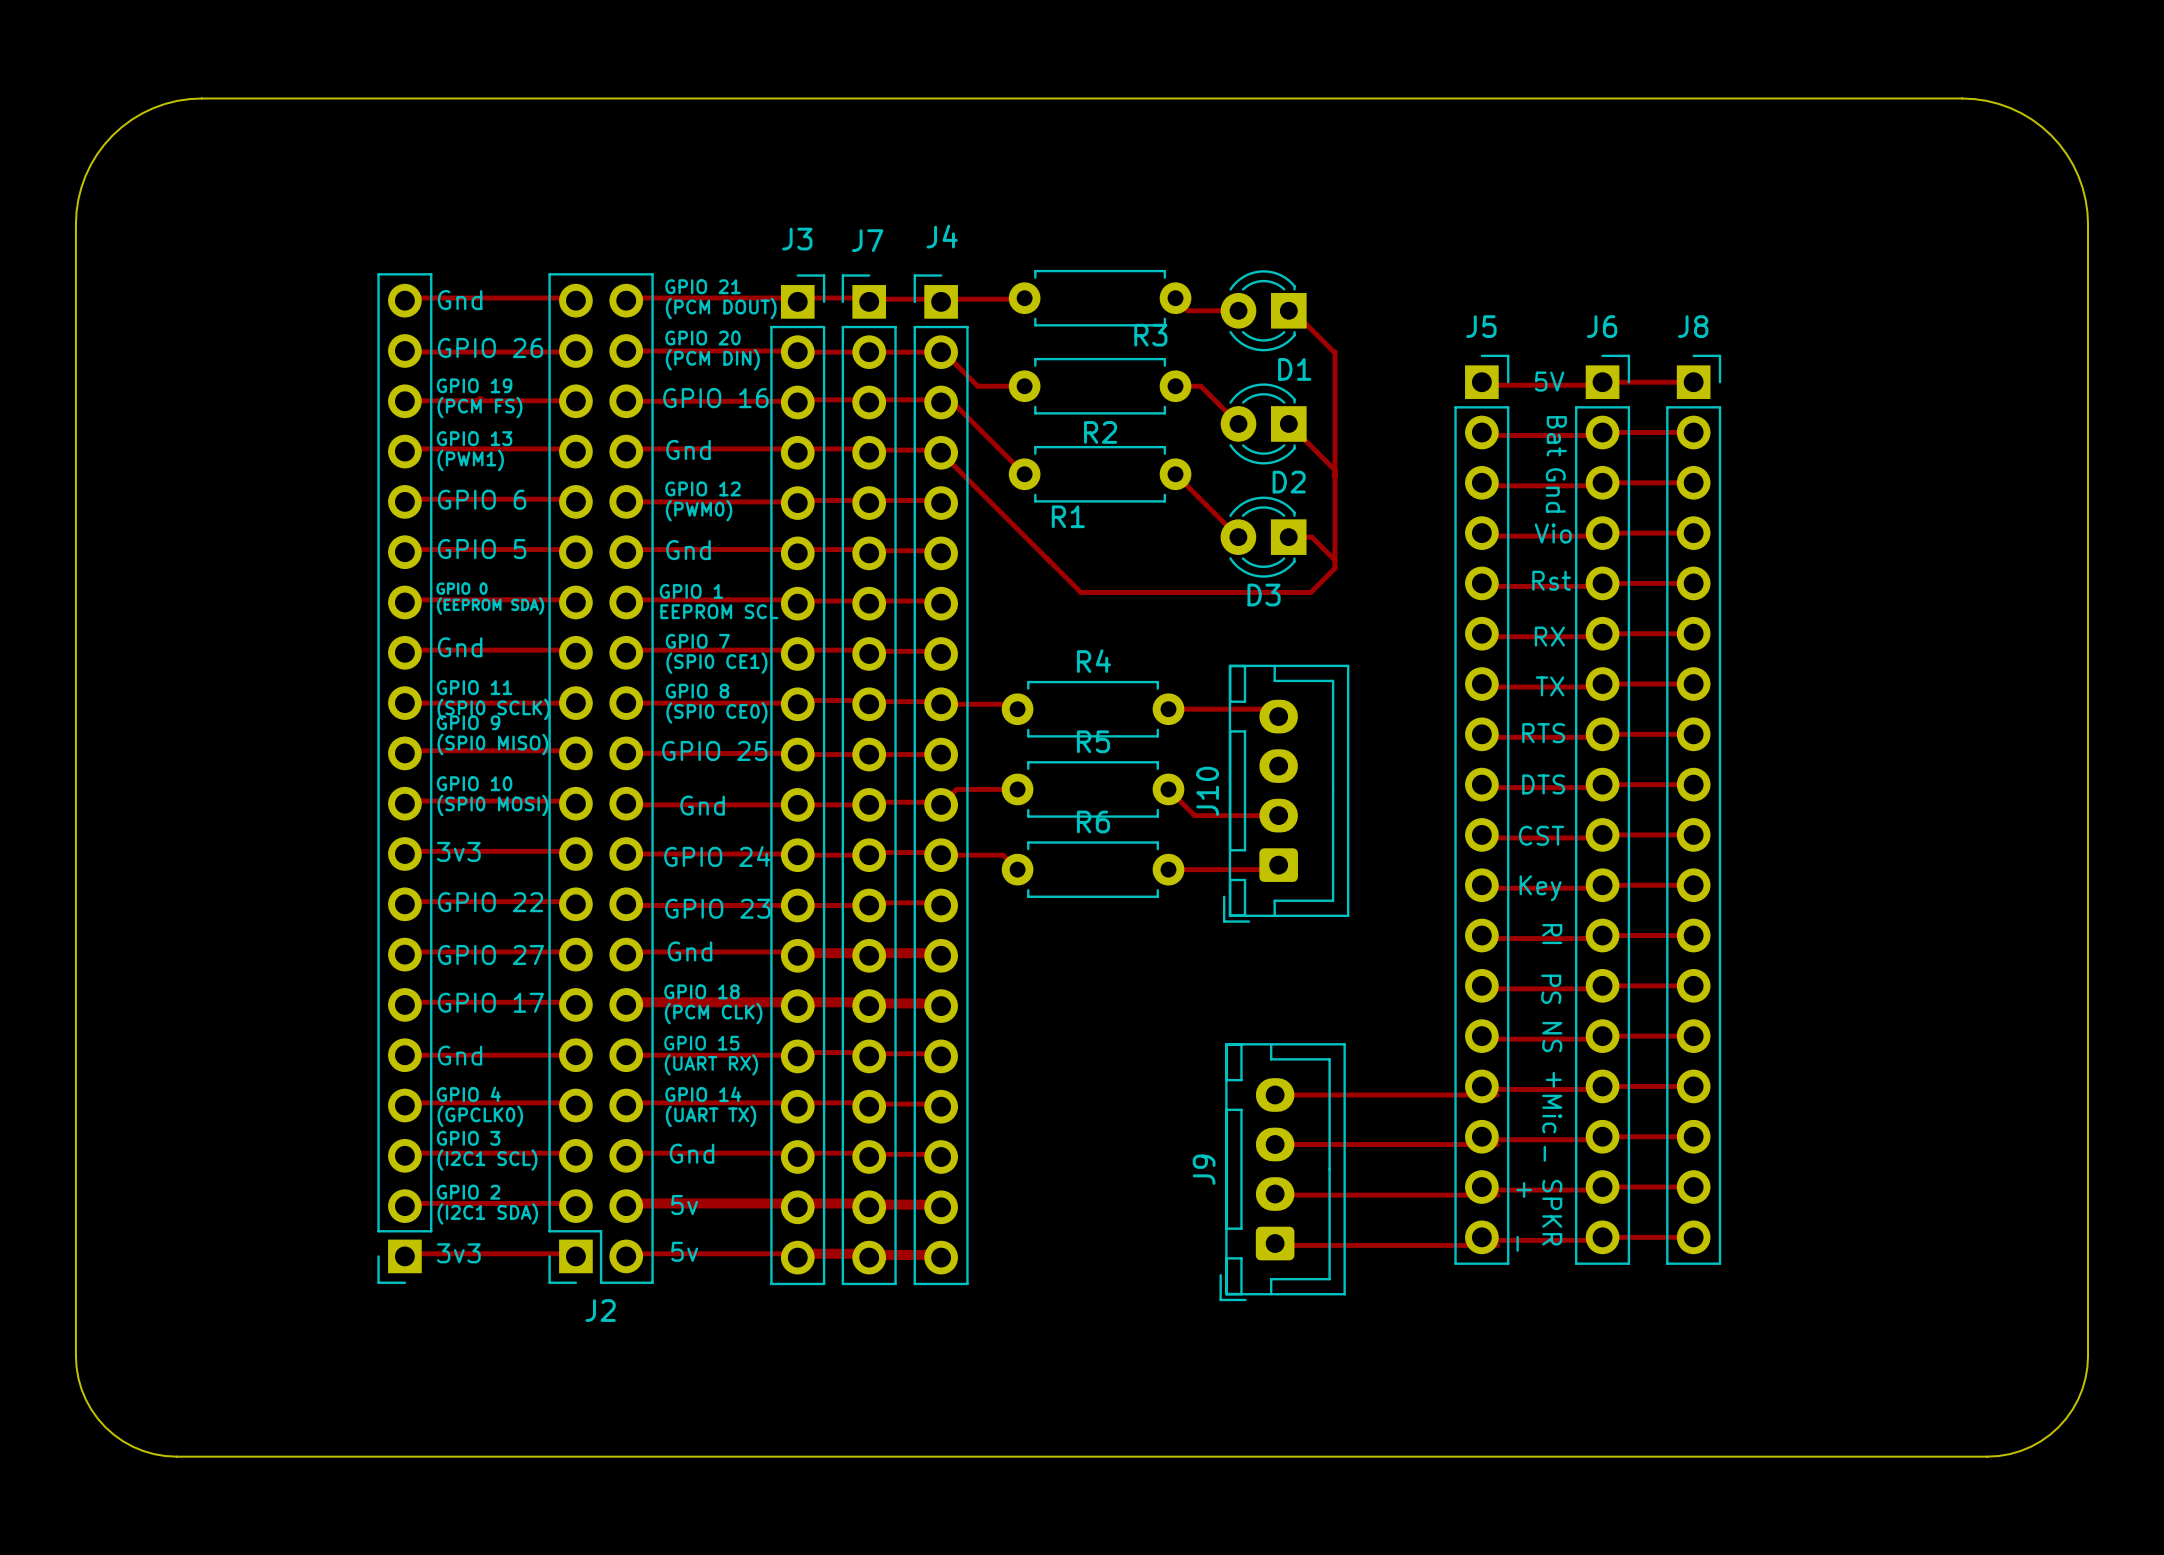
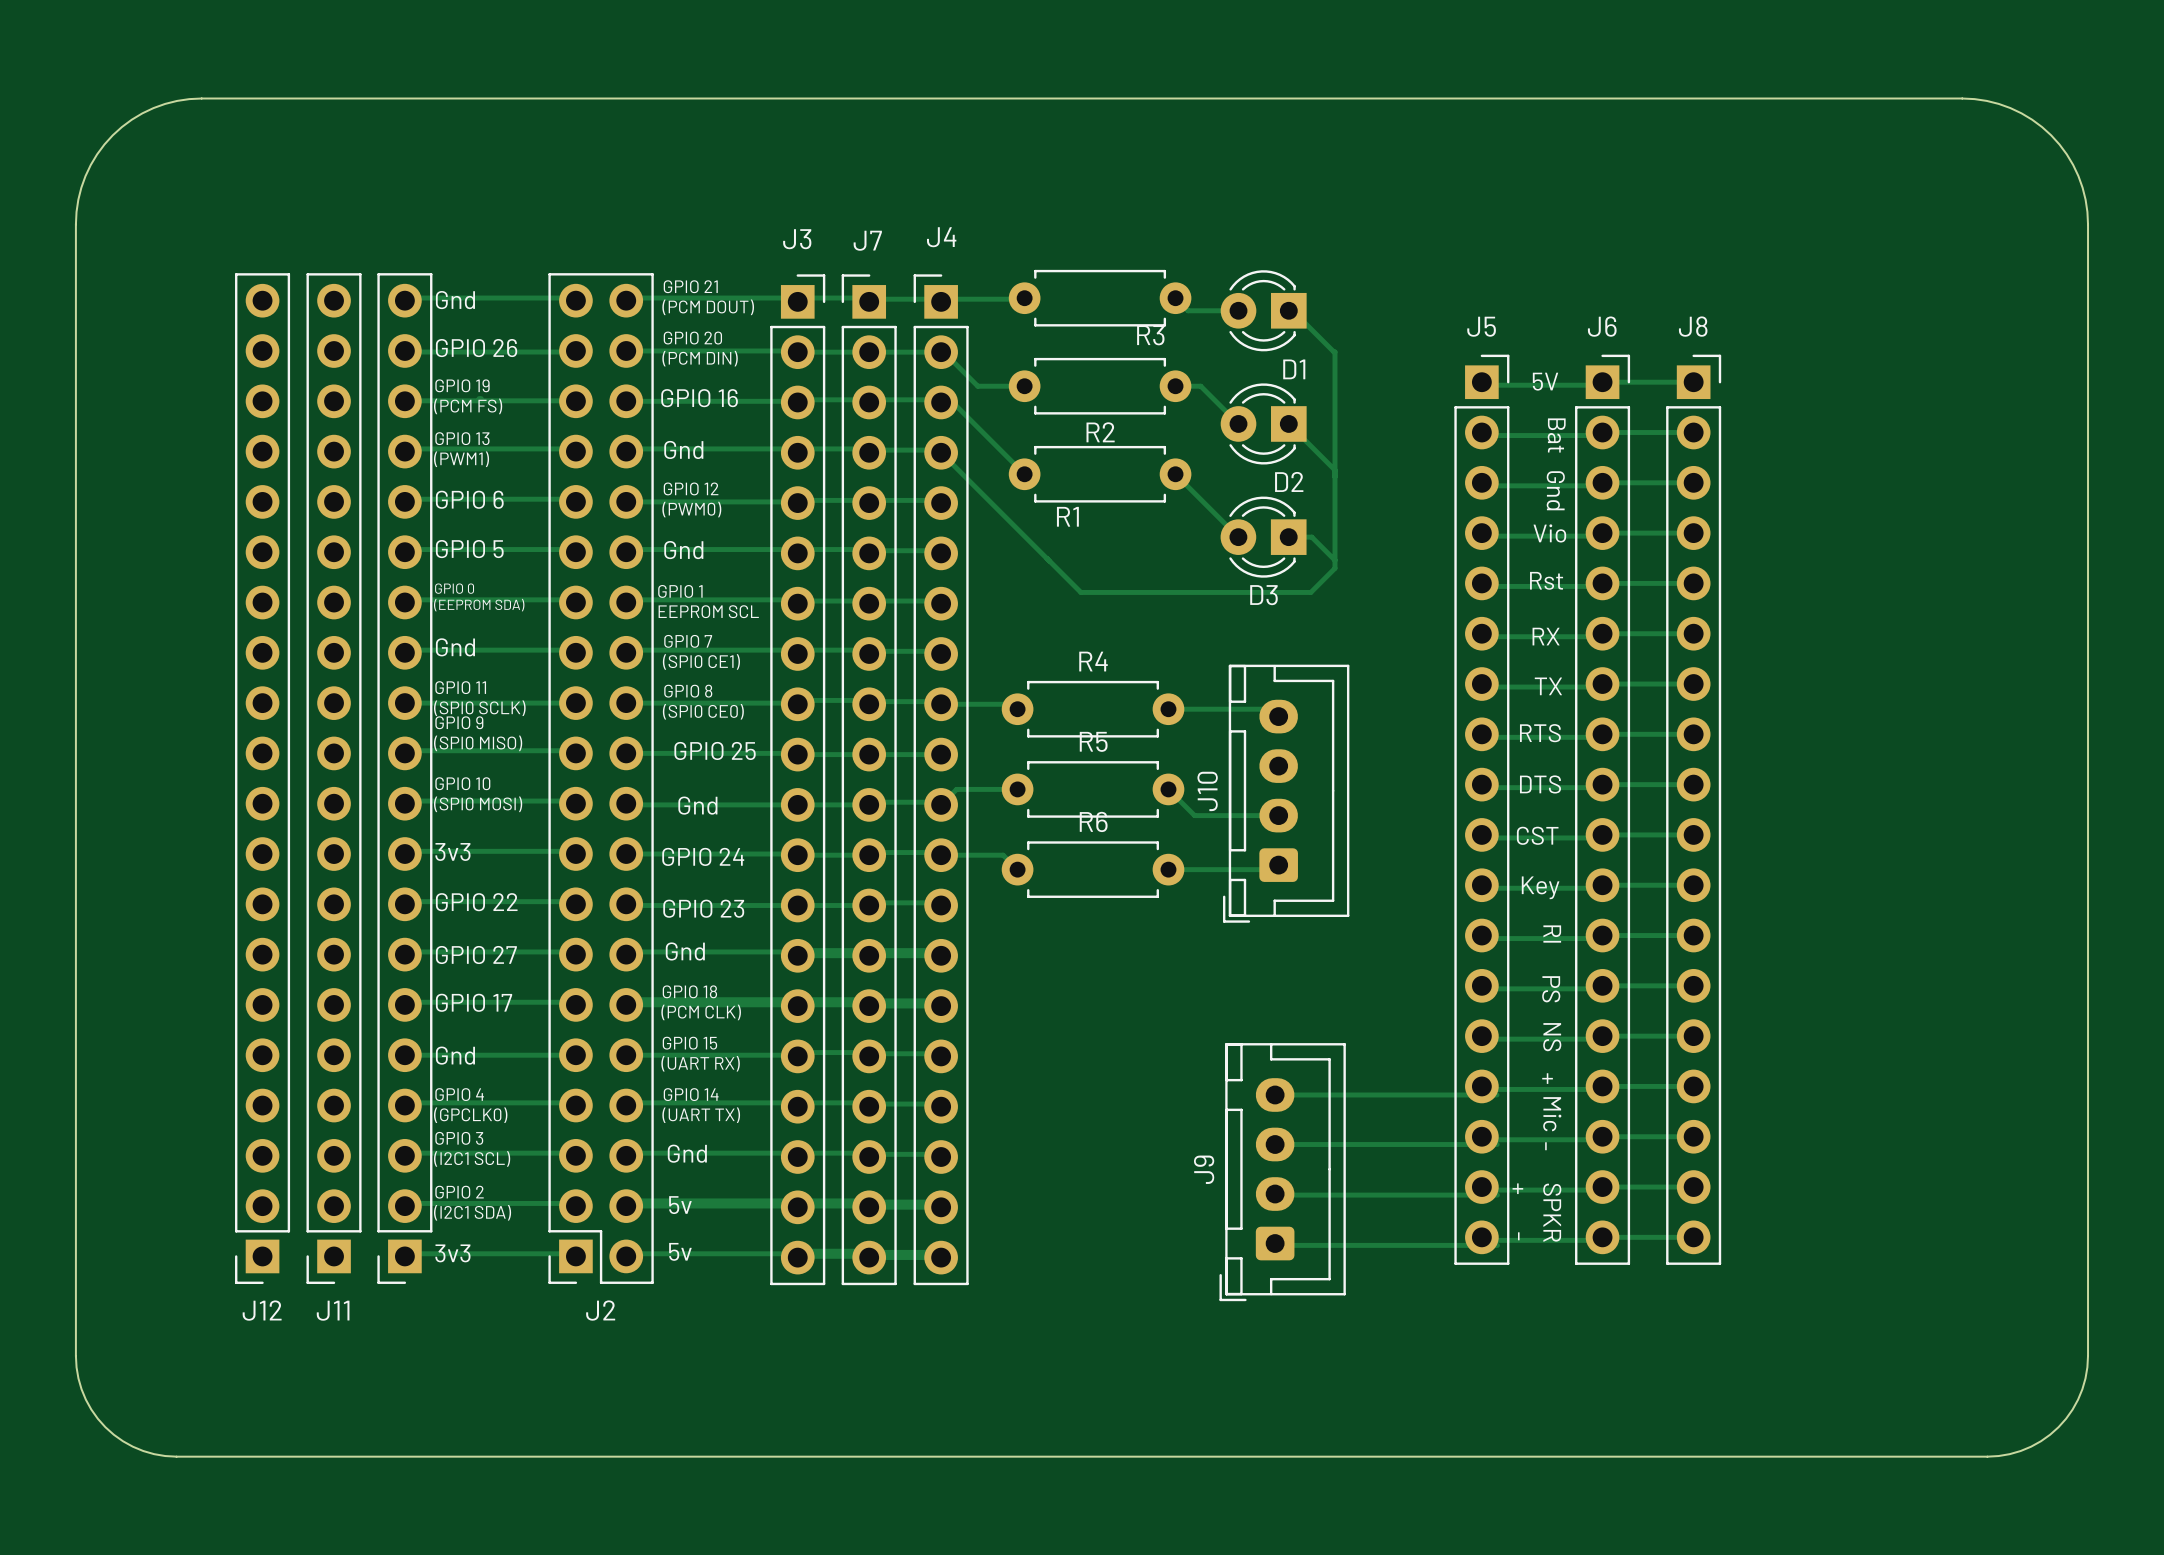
J12: none -> (262, 778)
J11: none -> (334, 778)

